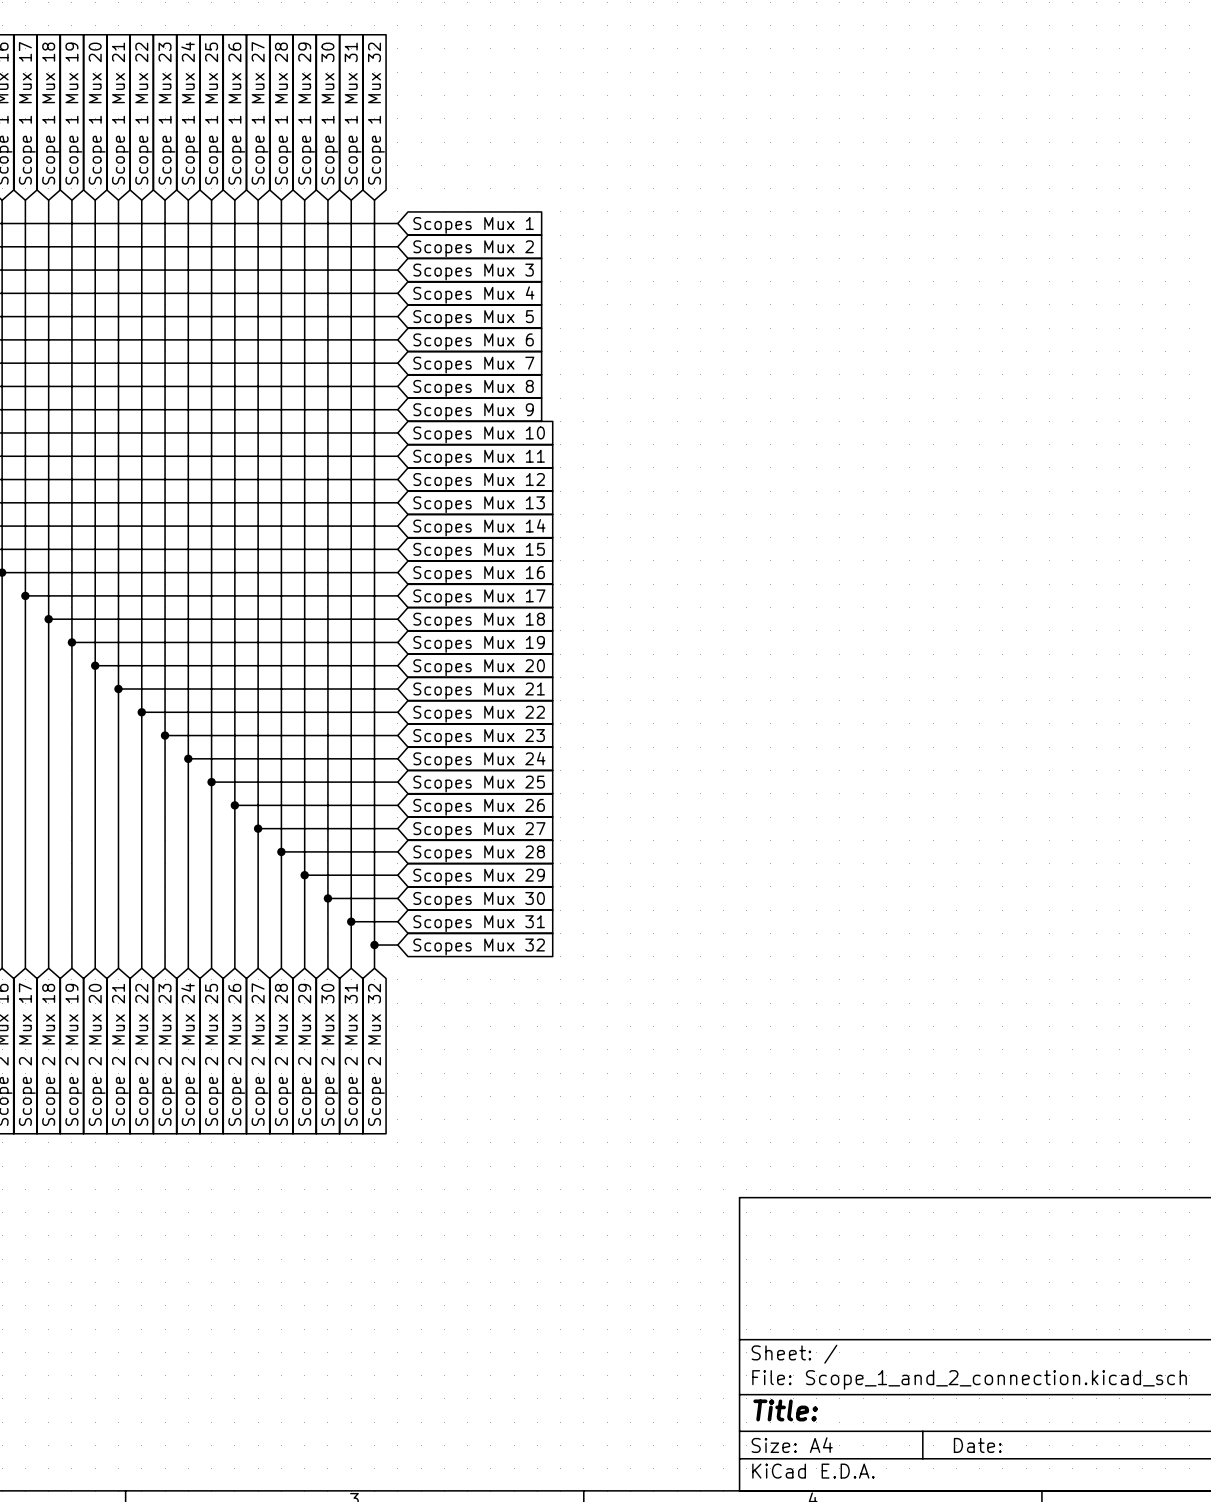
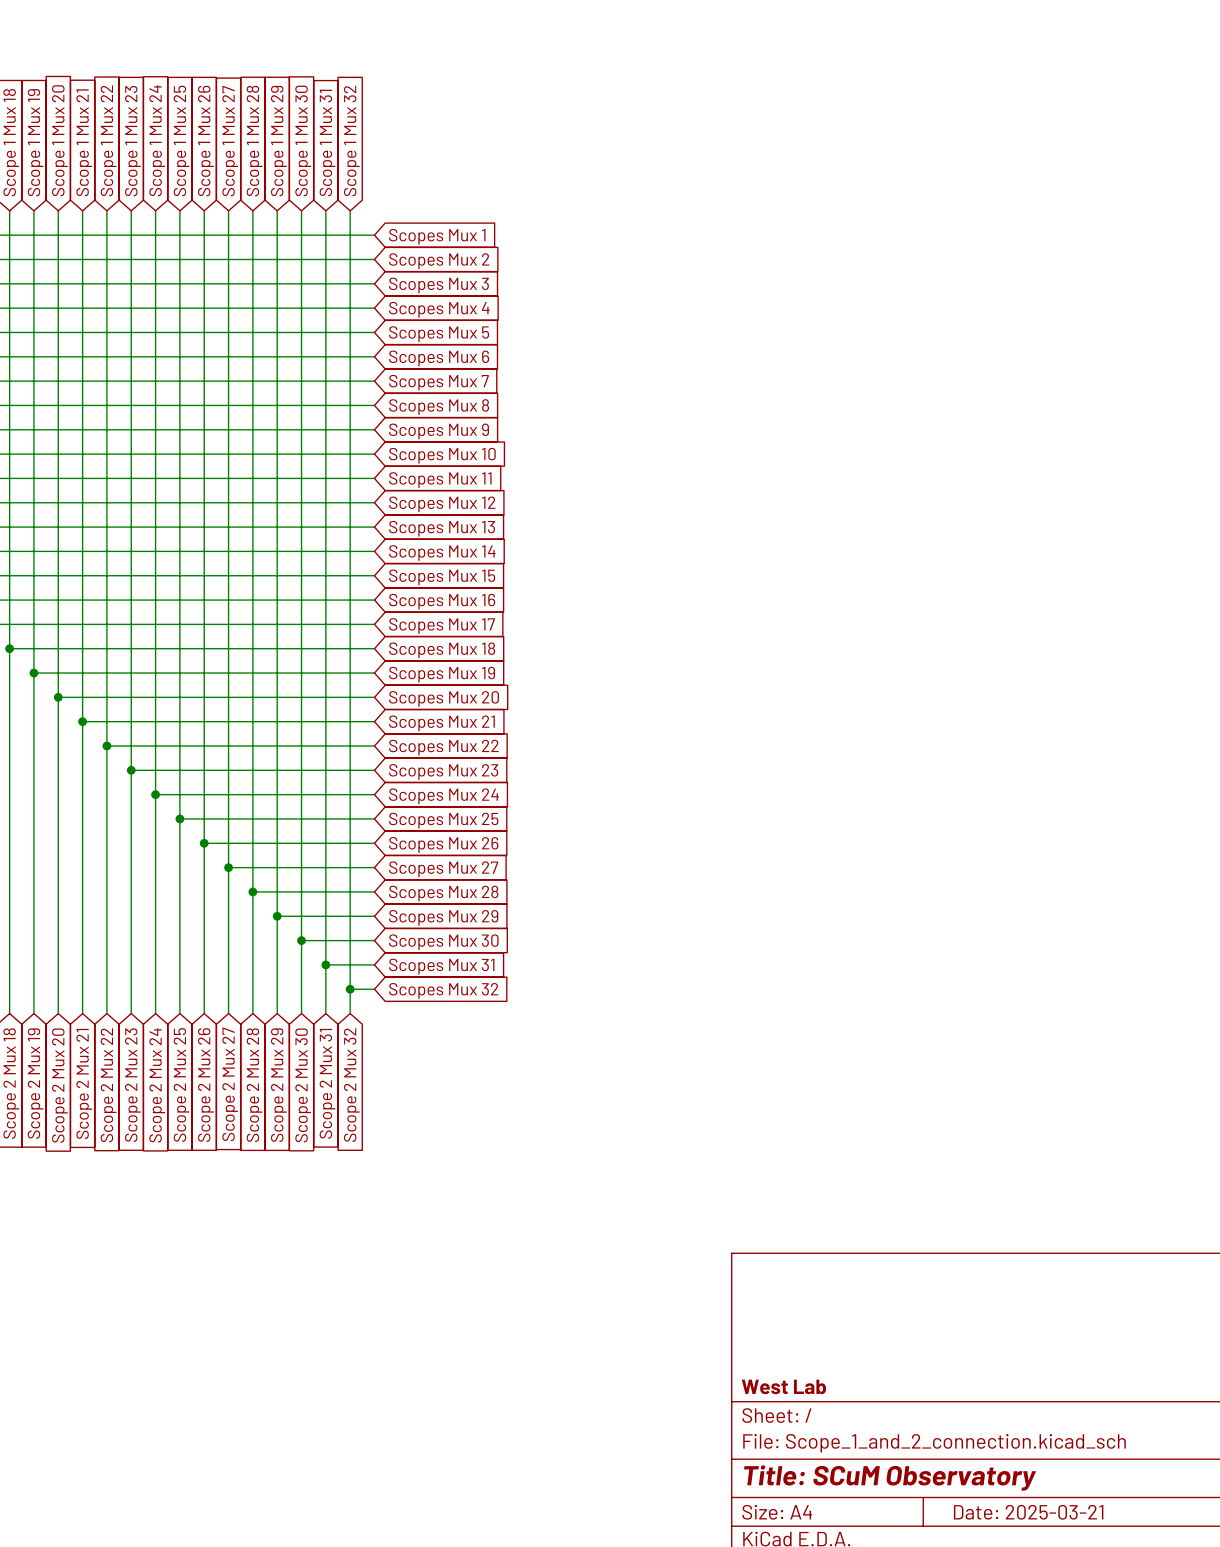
title block: none -> West Lab (783, 1386)
title block: Title: (785, 1410) -> Title: SCuM Observatory (890, 1478)
title block: Date: (977, 1445) -> Date: 2025-03-21 (1028, 1512)

